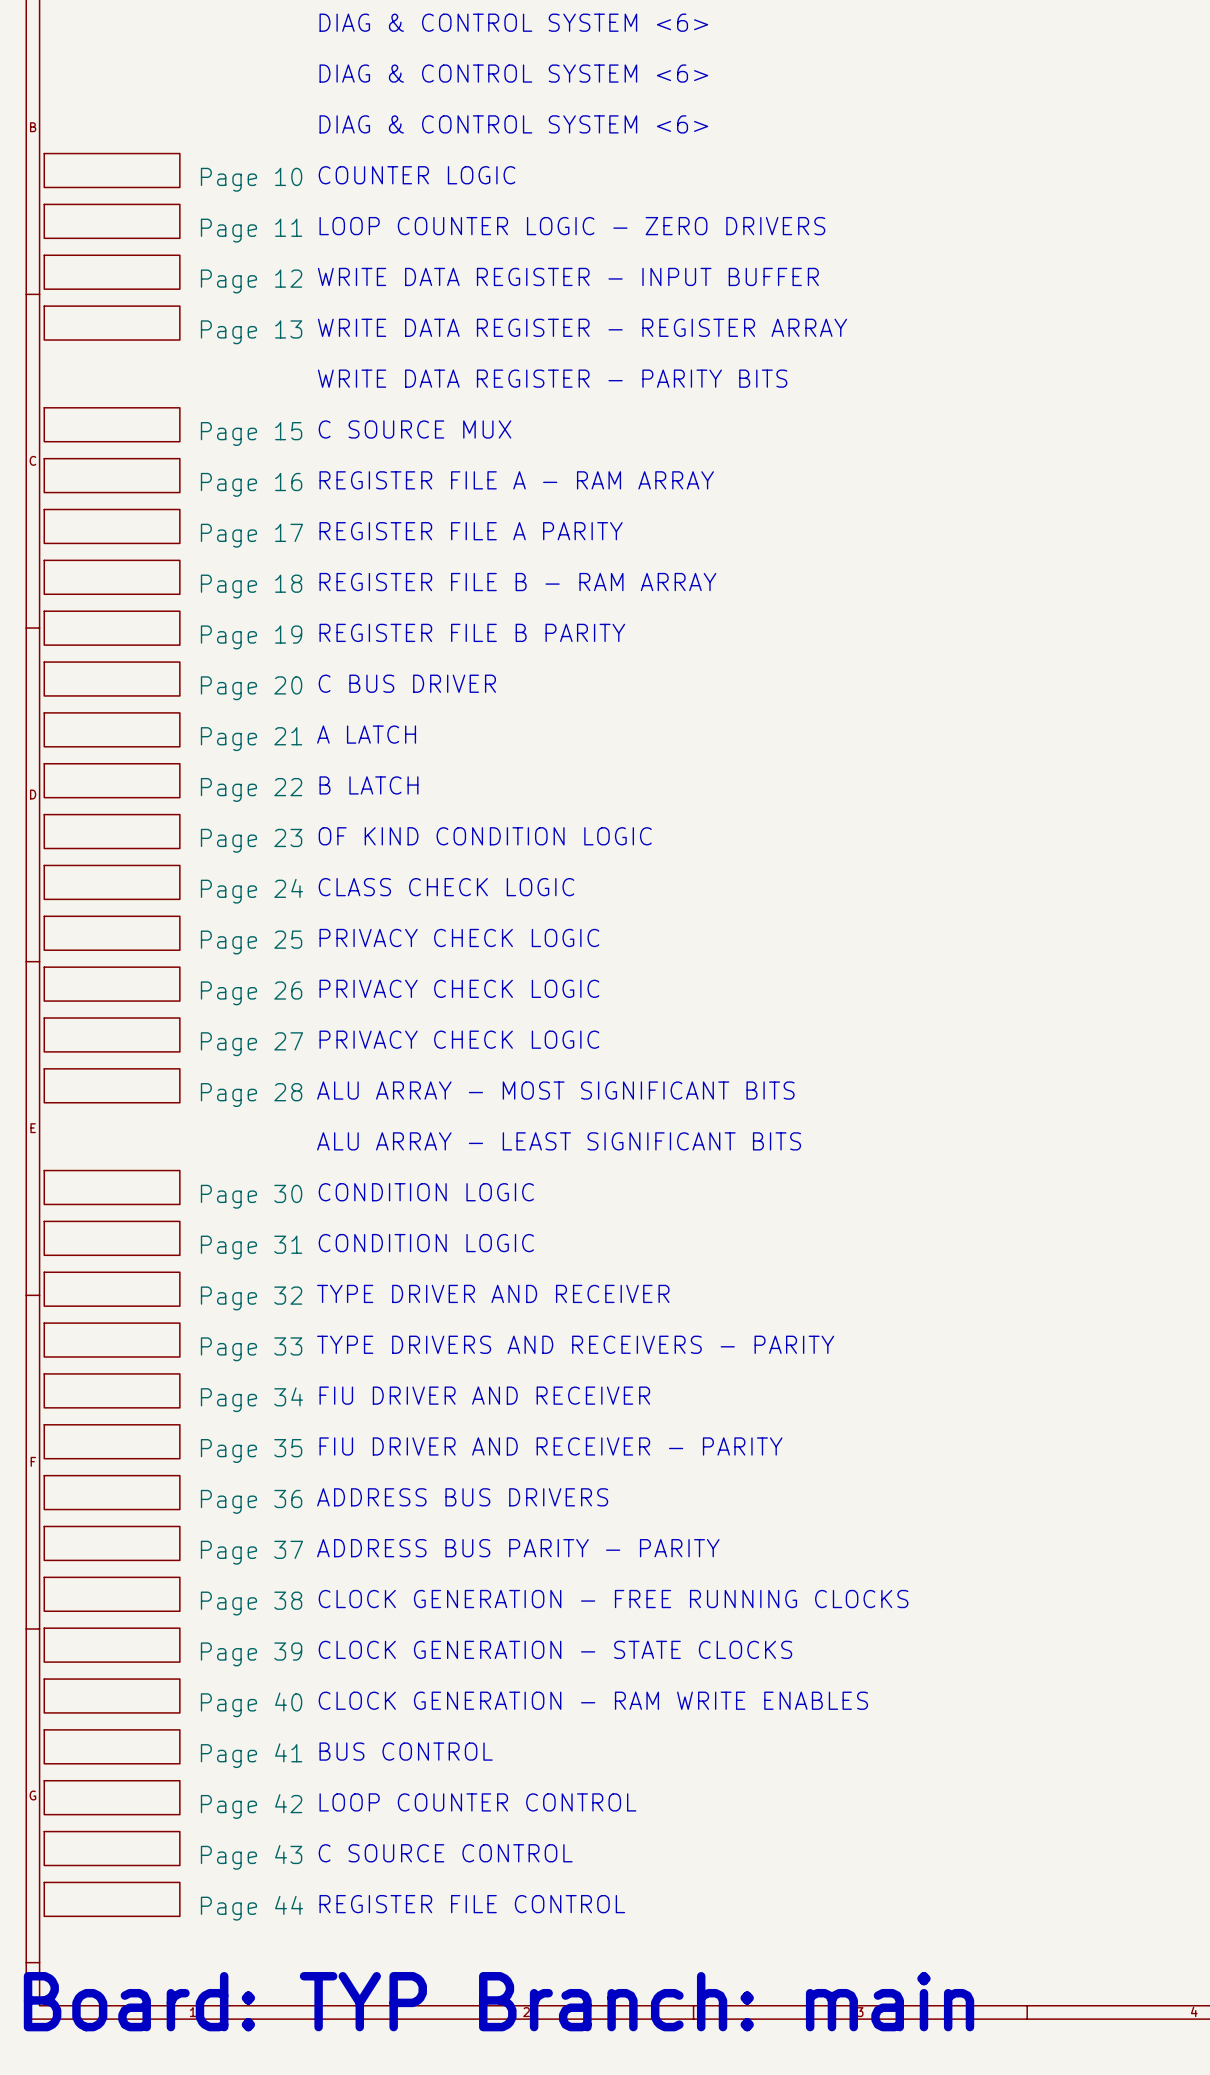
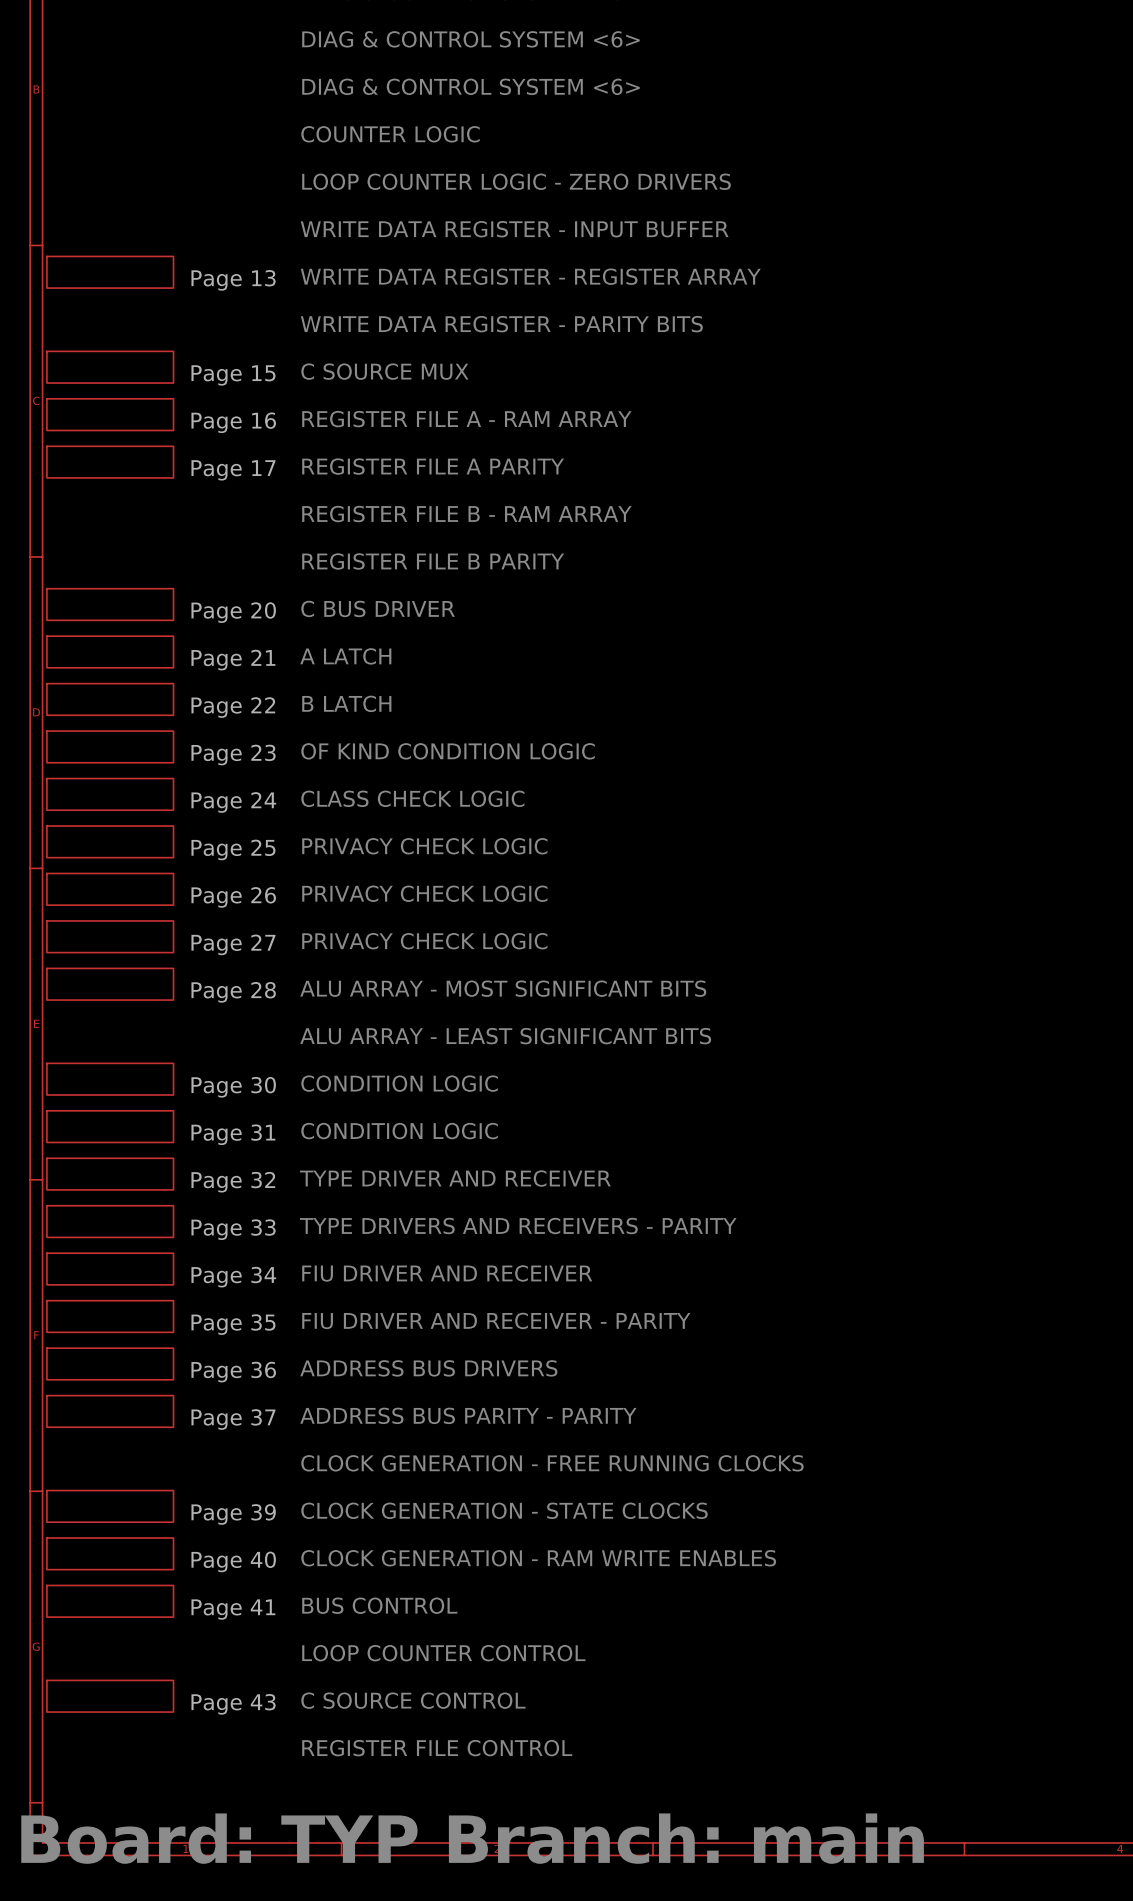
sheet Page 10: (112, 170) -> none
sheet Page 11: (112, 221) -> none
sheet Page 12: (112, 272) -> none
sheet Page 18: (112, 577) -> none
sheet Page 19: (112, 628) -> none
sheet Page 38: (112, 1594) -> none
sheet Page 42: (112, 1797) -> none
sheet Page 44: (112, 1899) -> none

